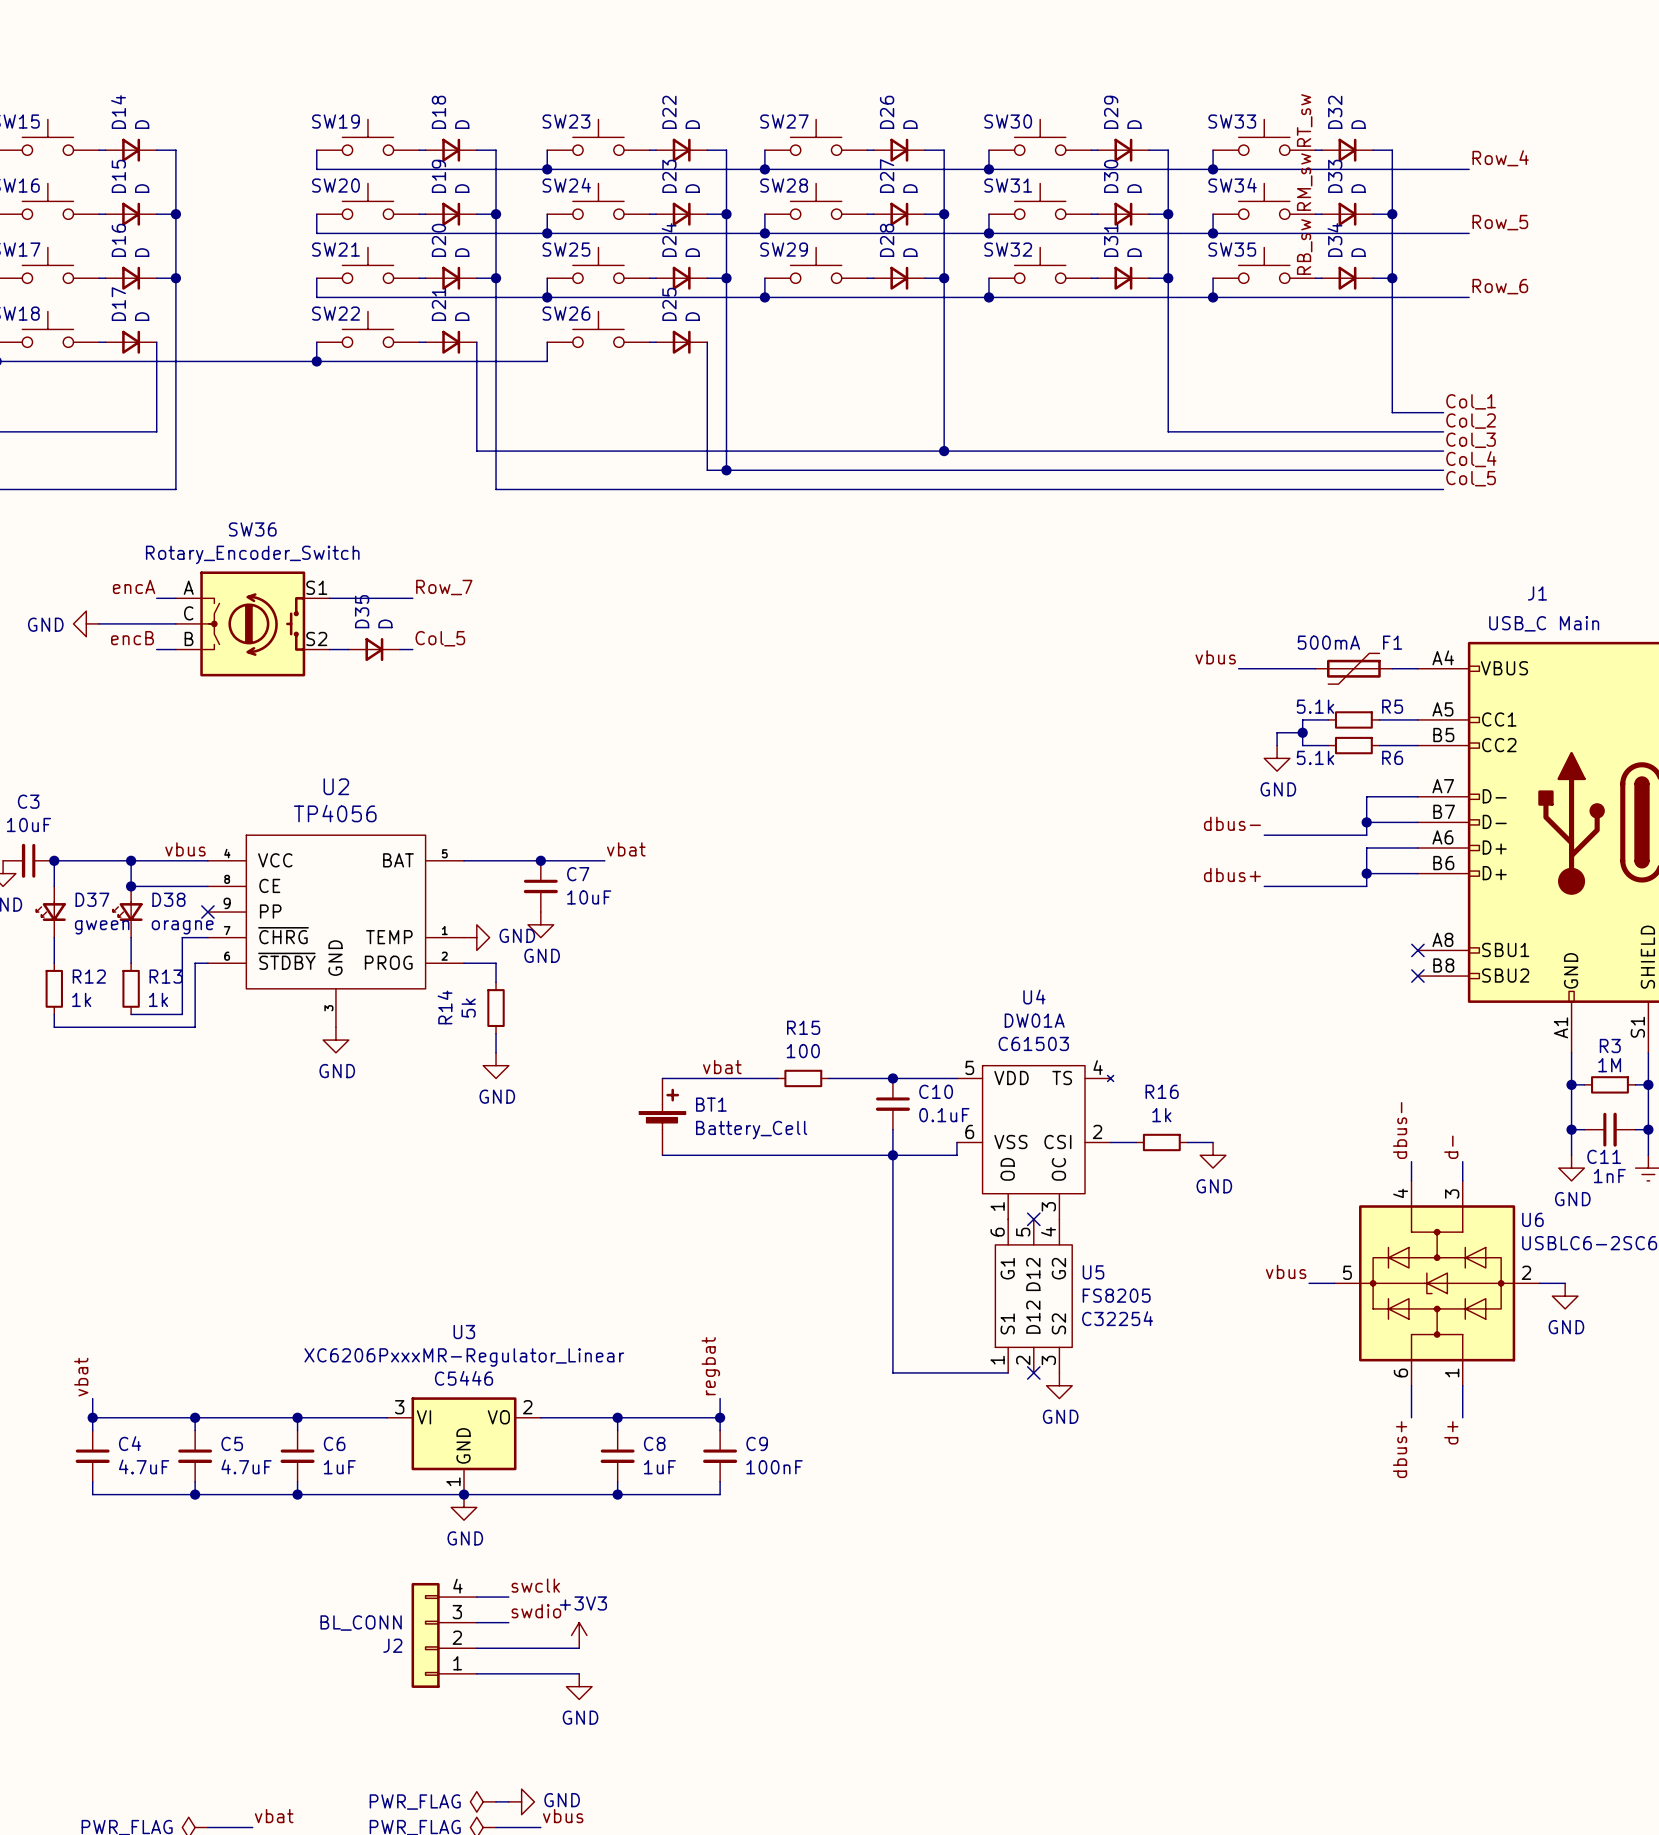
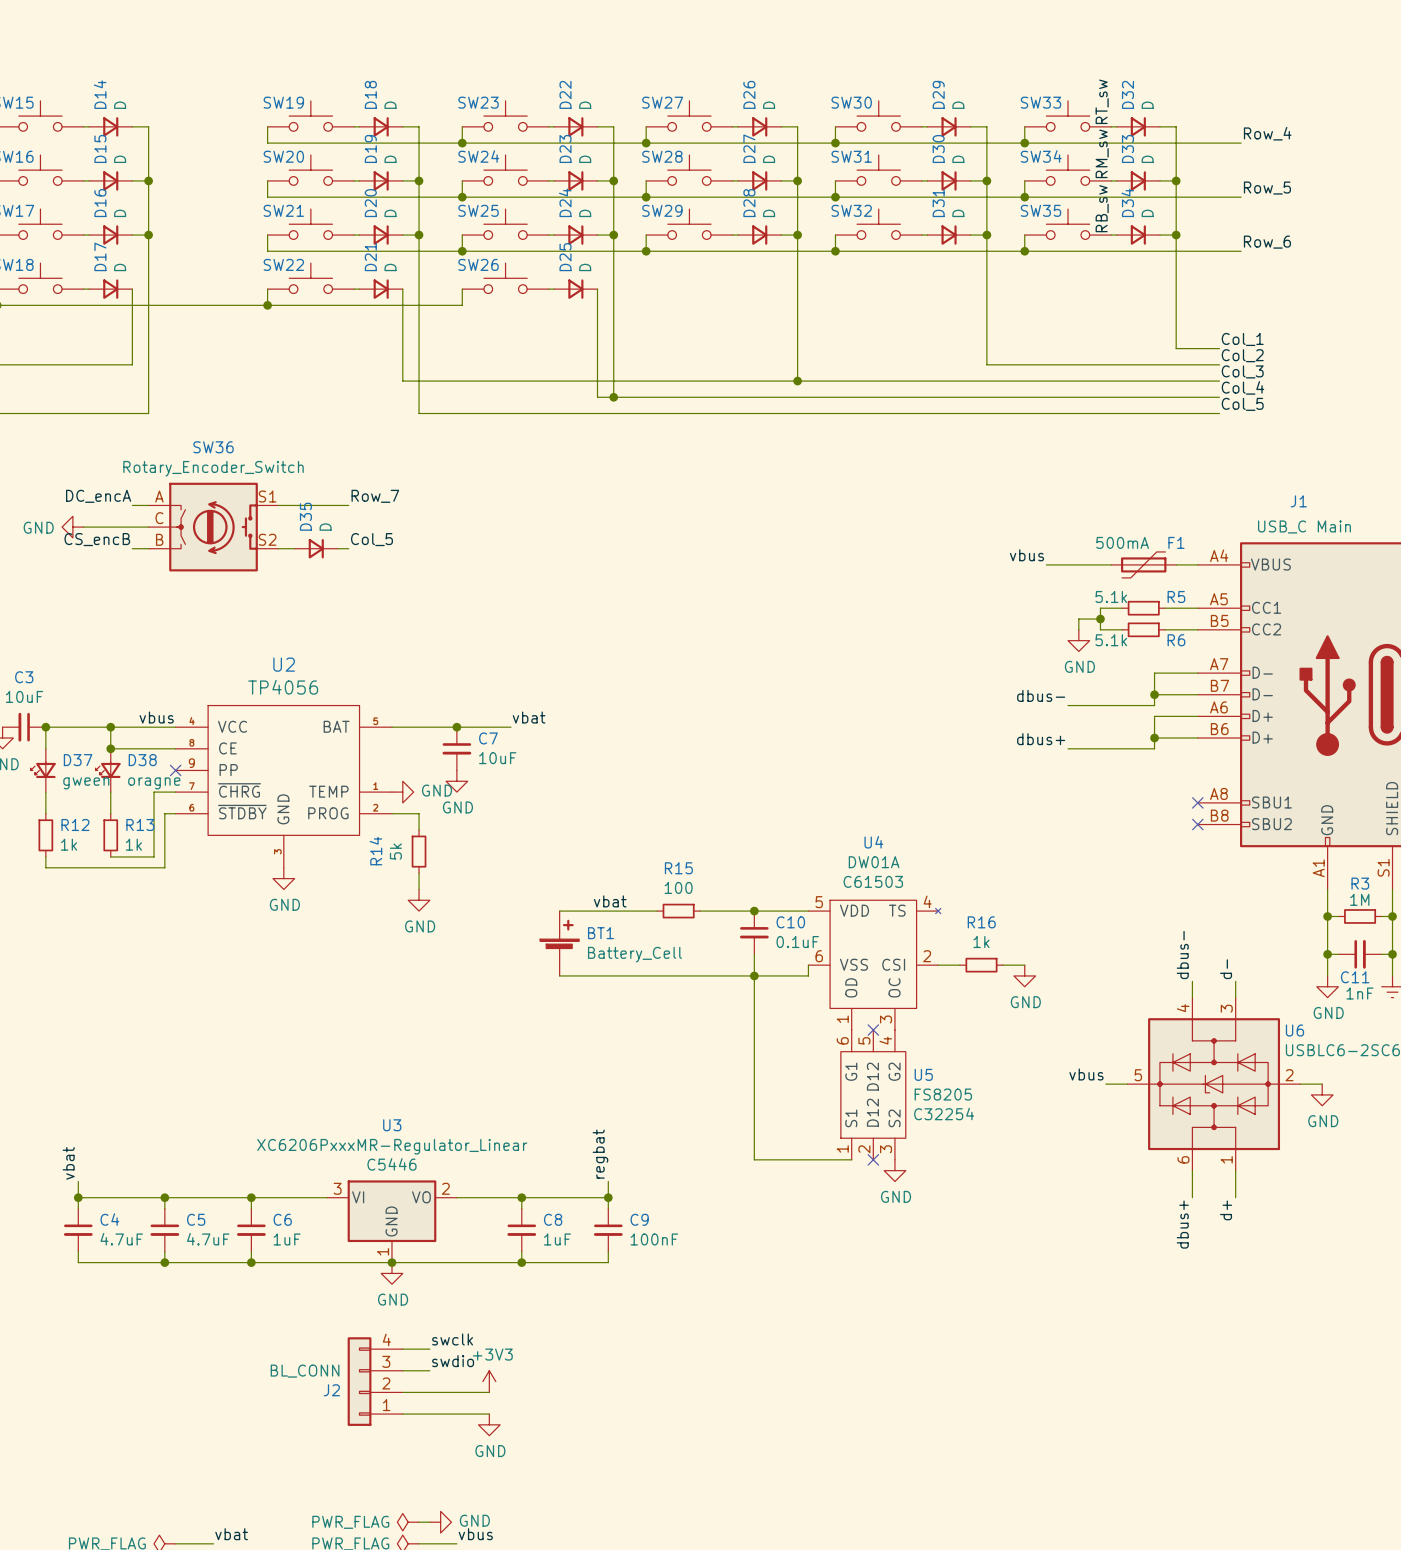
label: encA (134, 586) -> DC_encA (98, 496)
label: encB (132, 638) -> CS_encB (97, 539)

